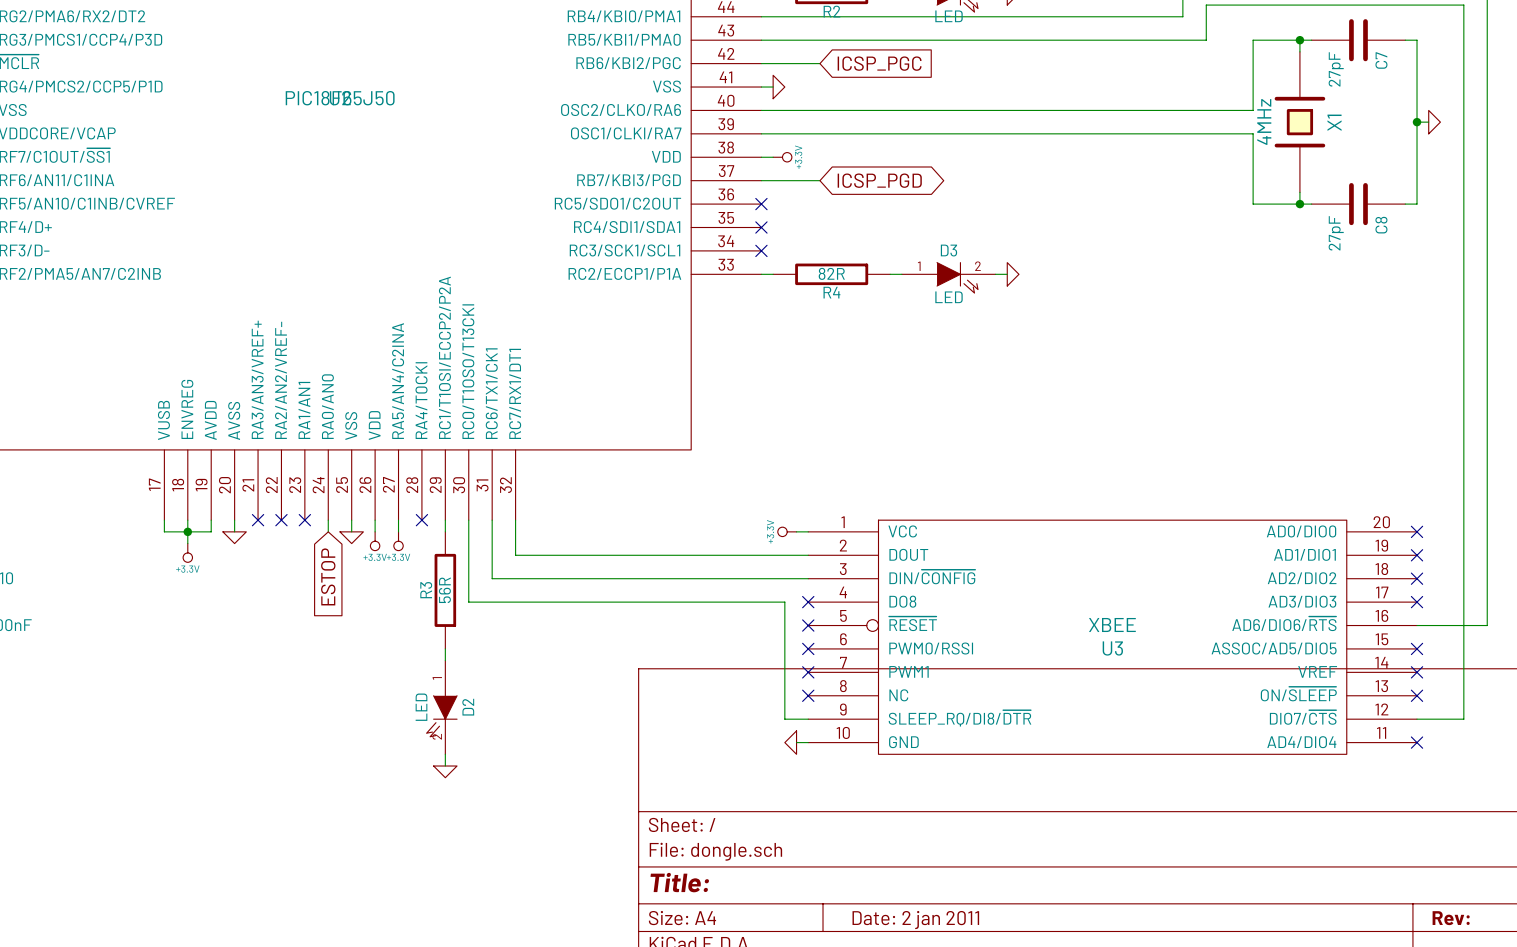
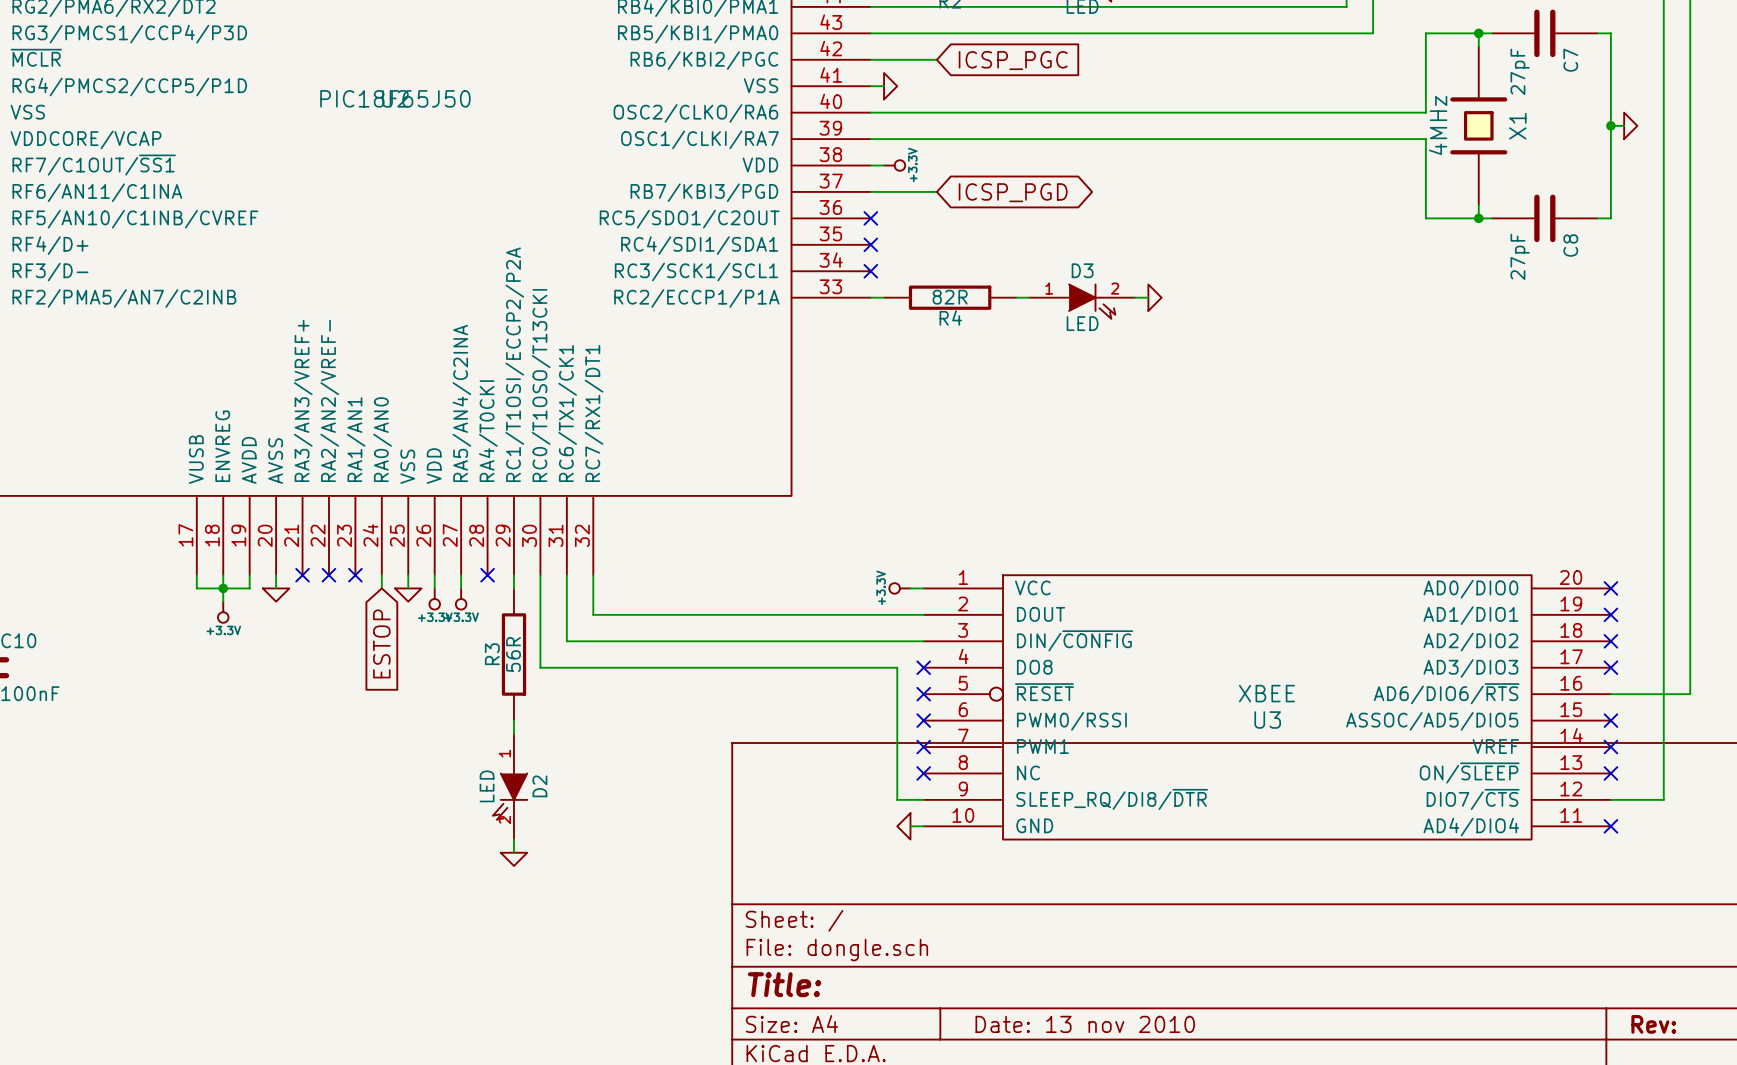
title block: Date: 2 jan 2011 (915, 920) -> Date: 13 nov 2010 (1085, 1024)

